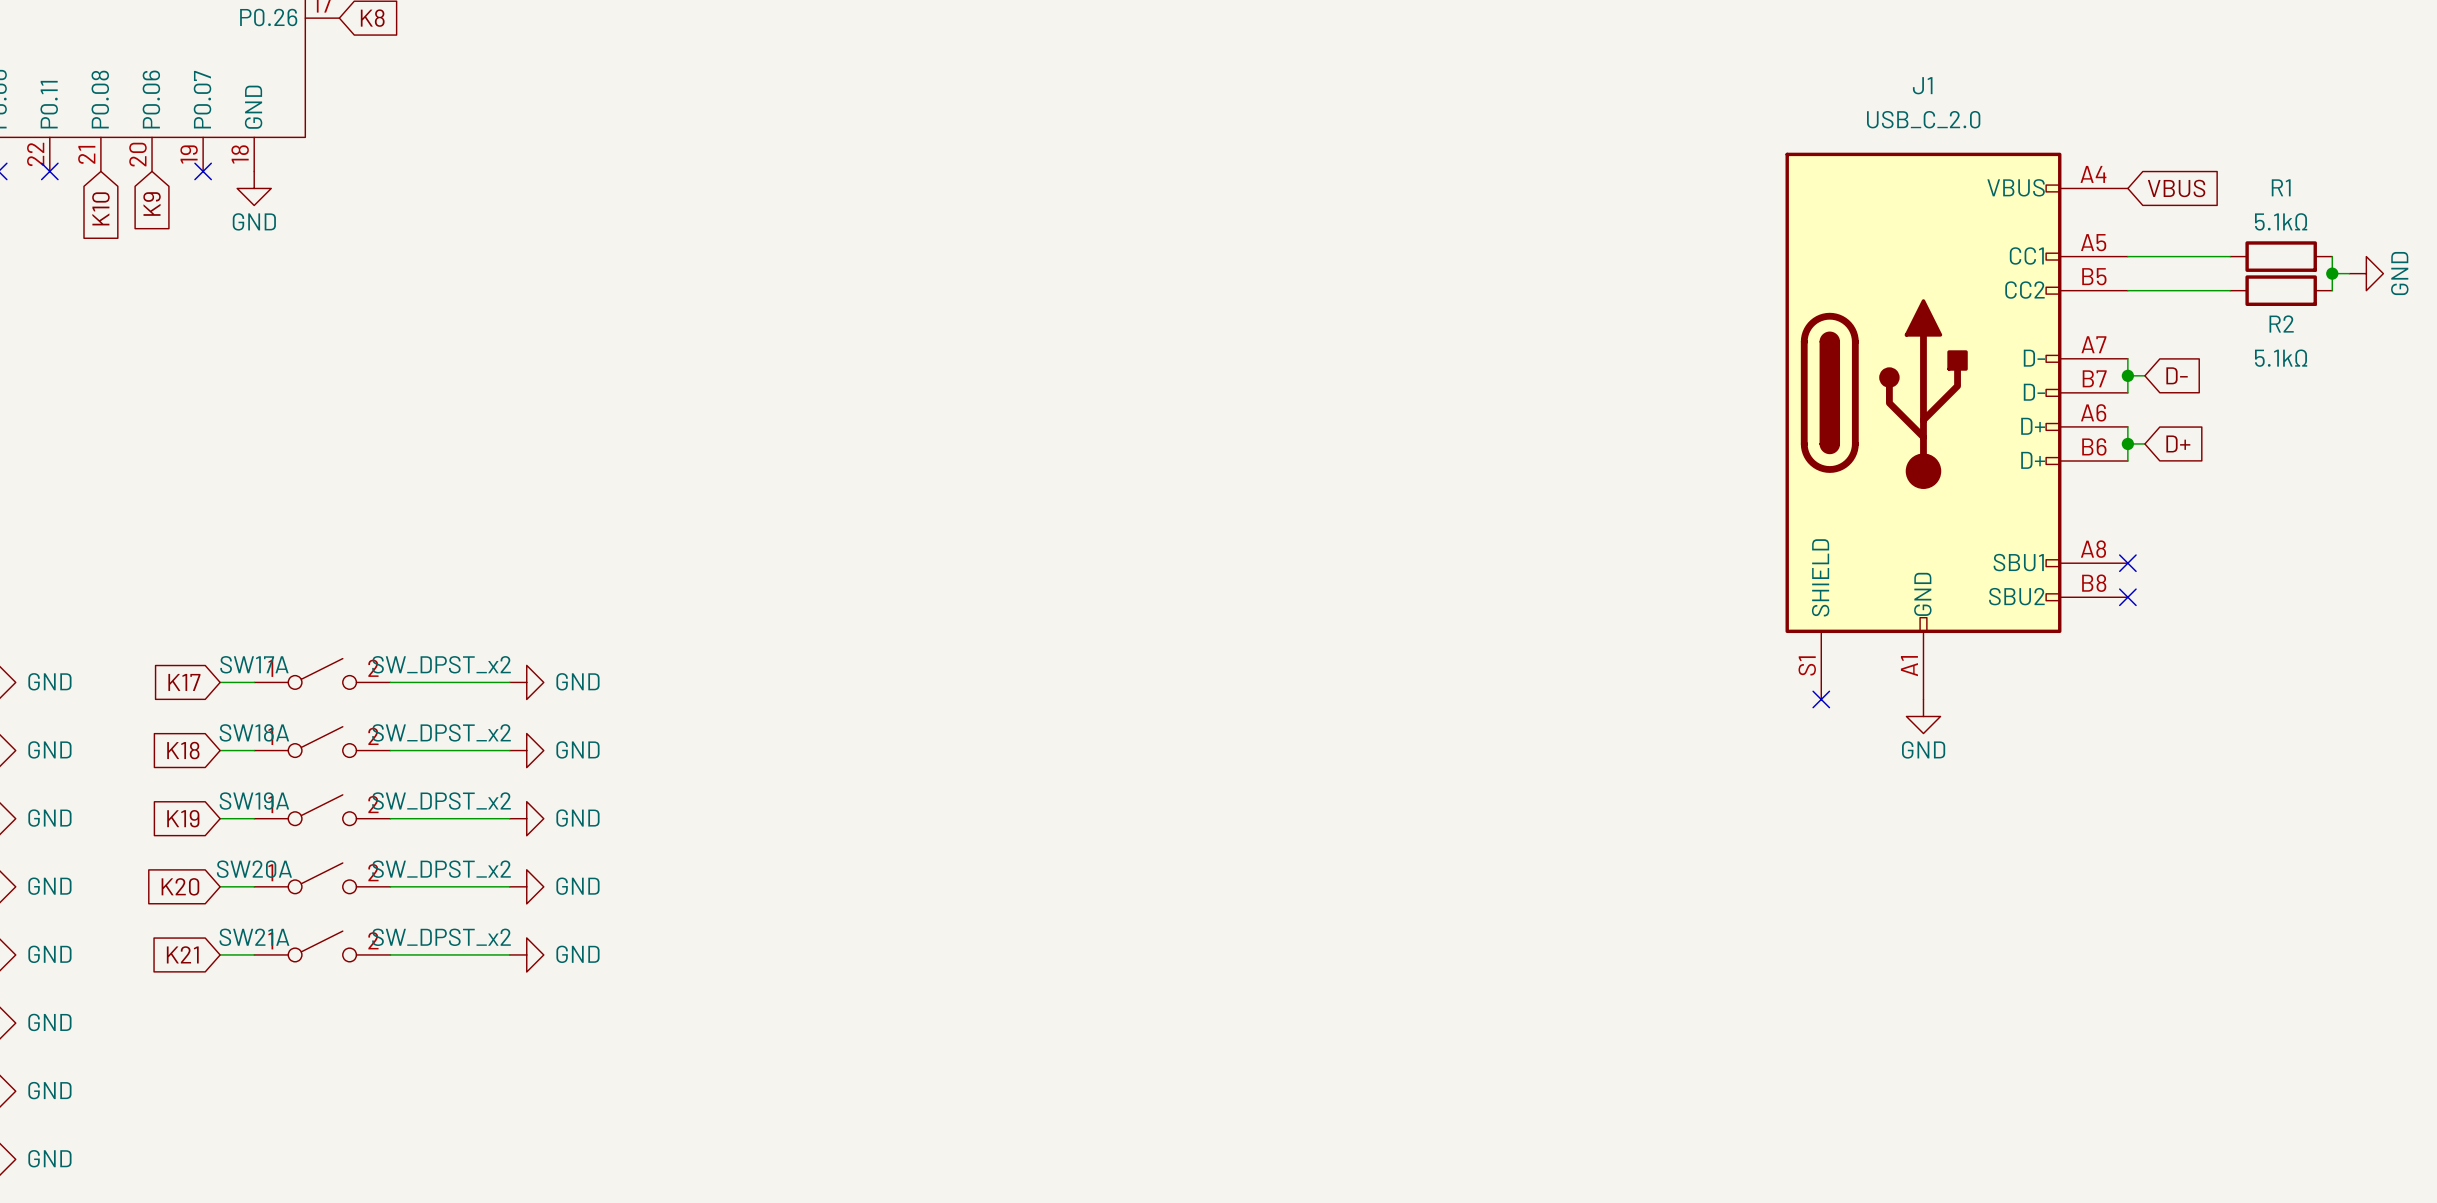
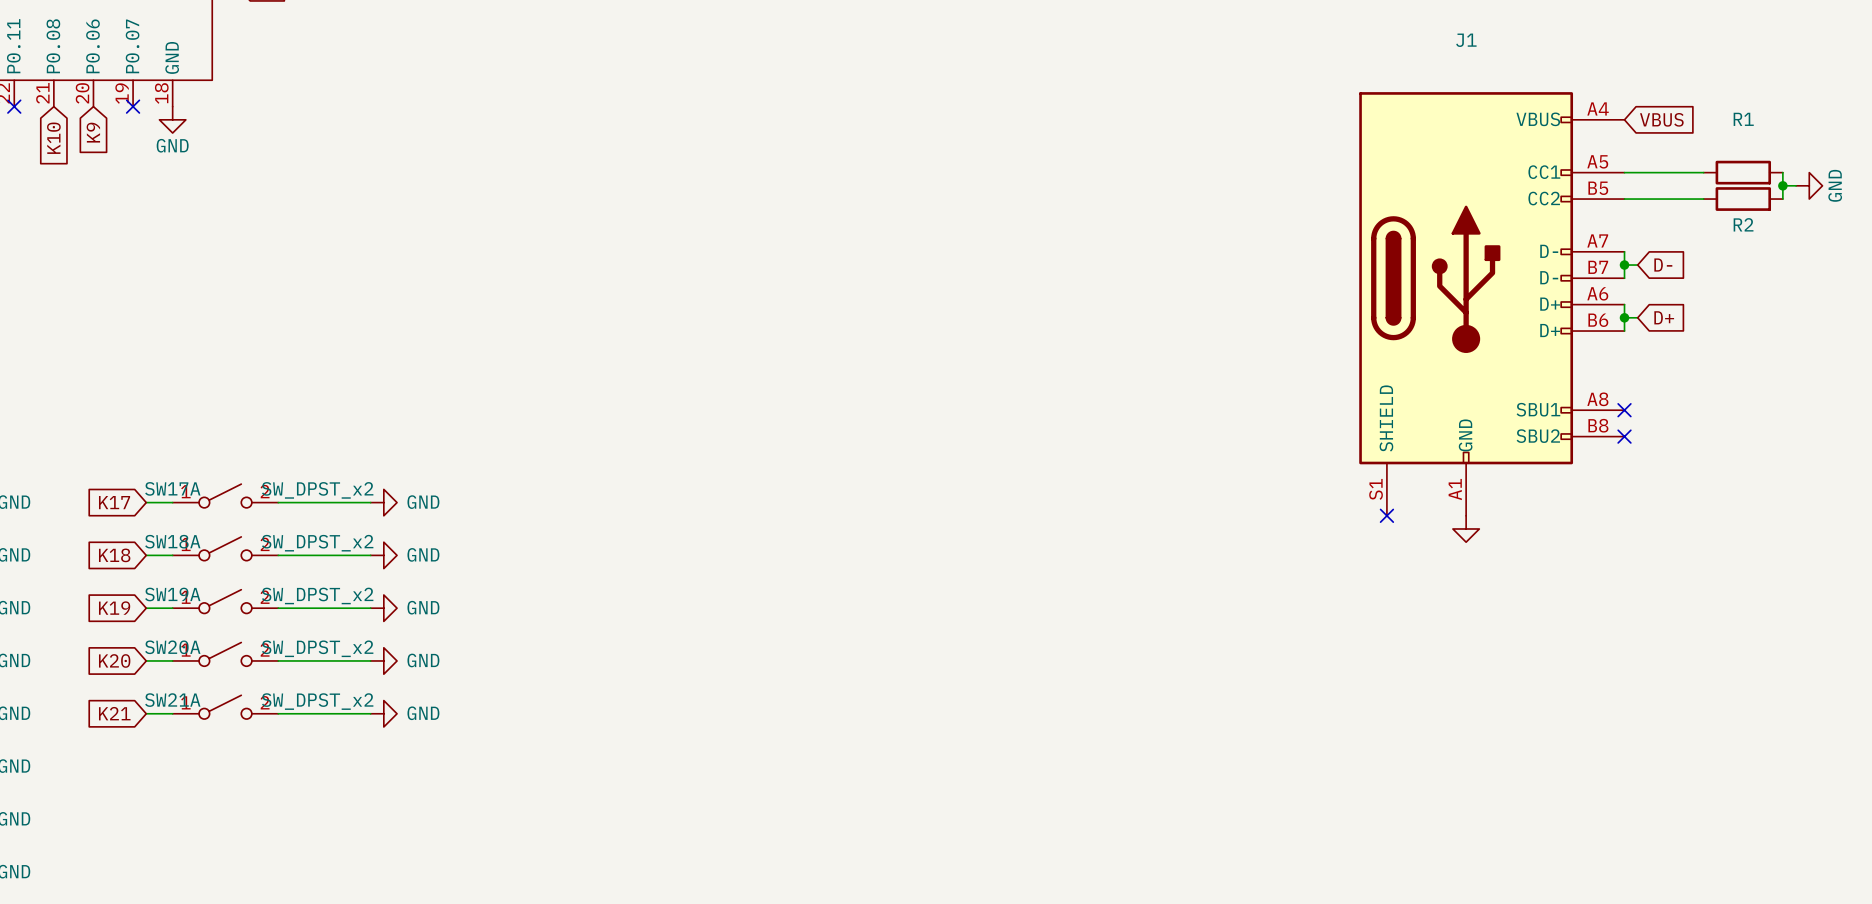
J1 value: USB_C_2.0 (1923, 119) -> none
R1 value: 5.1kΩ (2281, 221) -> none
R2 value: 5.1kΩ (2281, 358) -> none
power symbol text: GND (1923, 749) -> none

